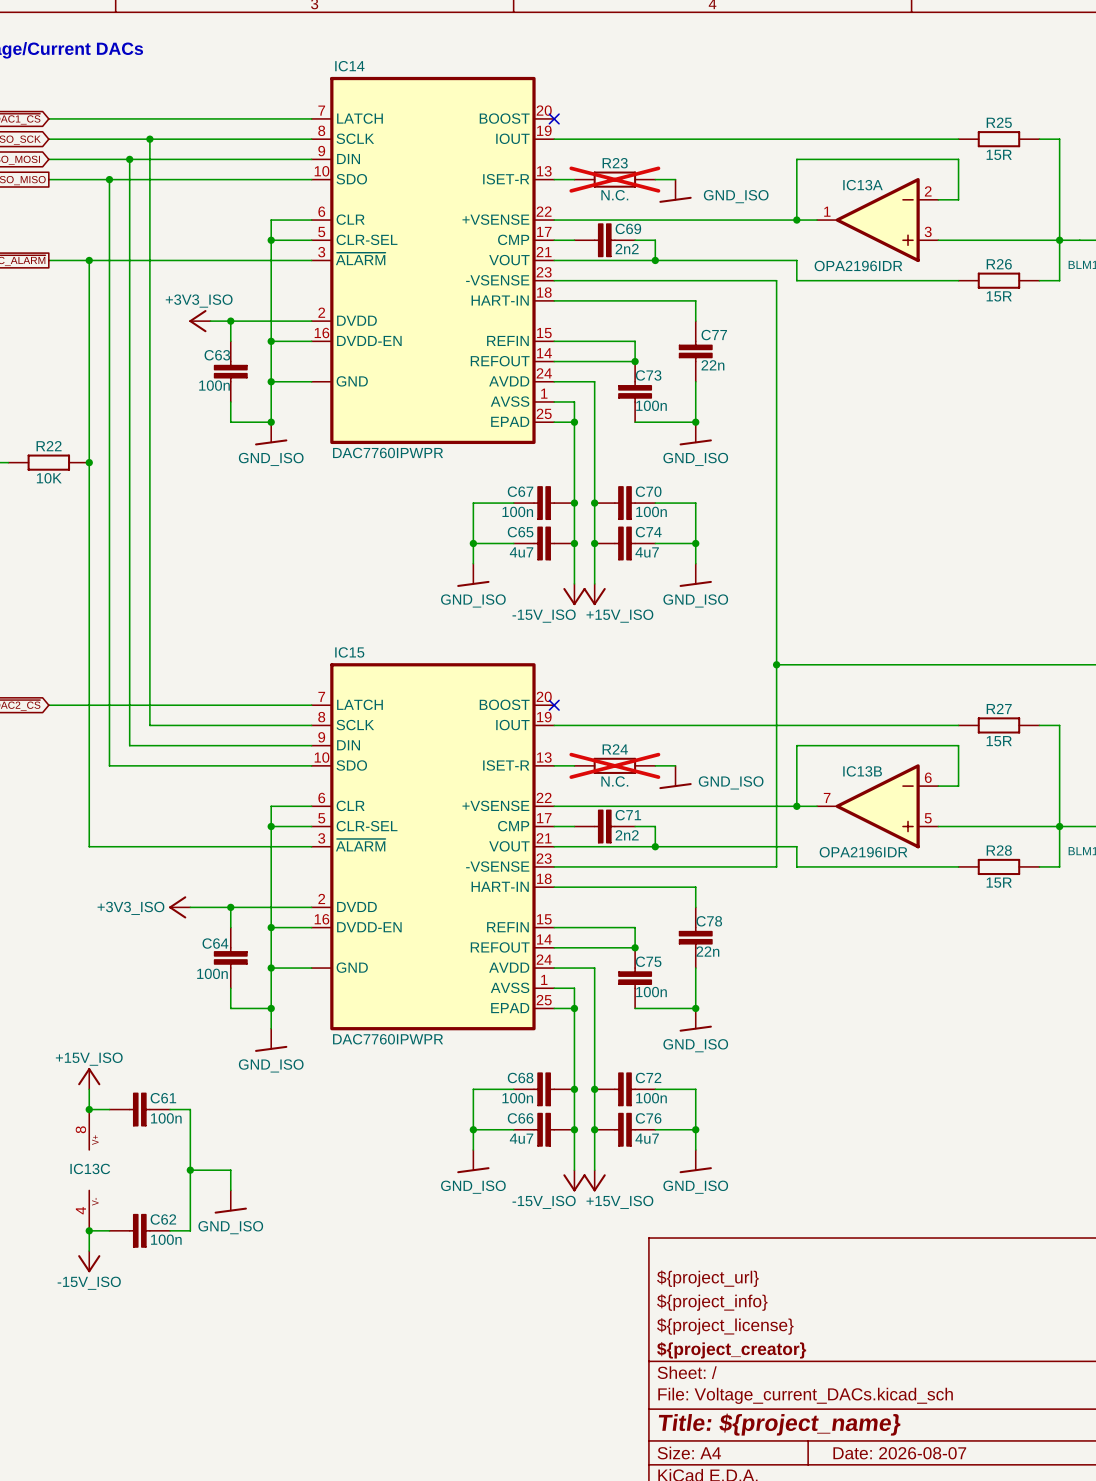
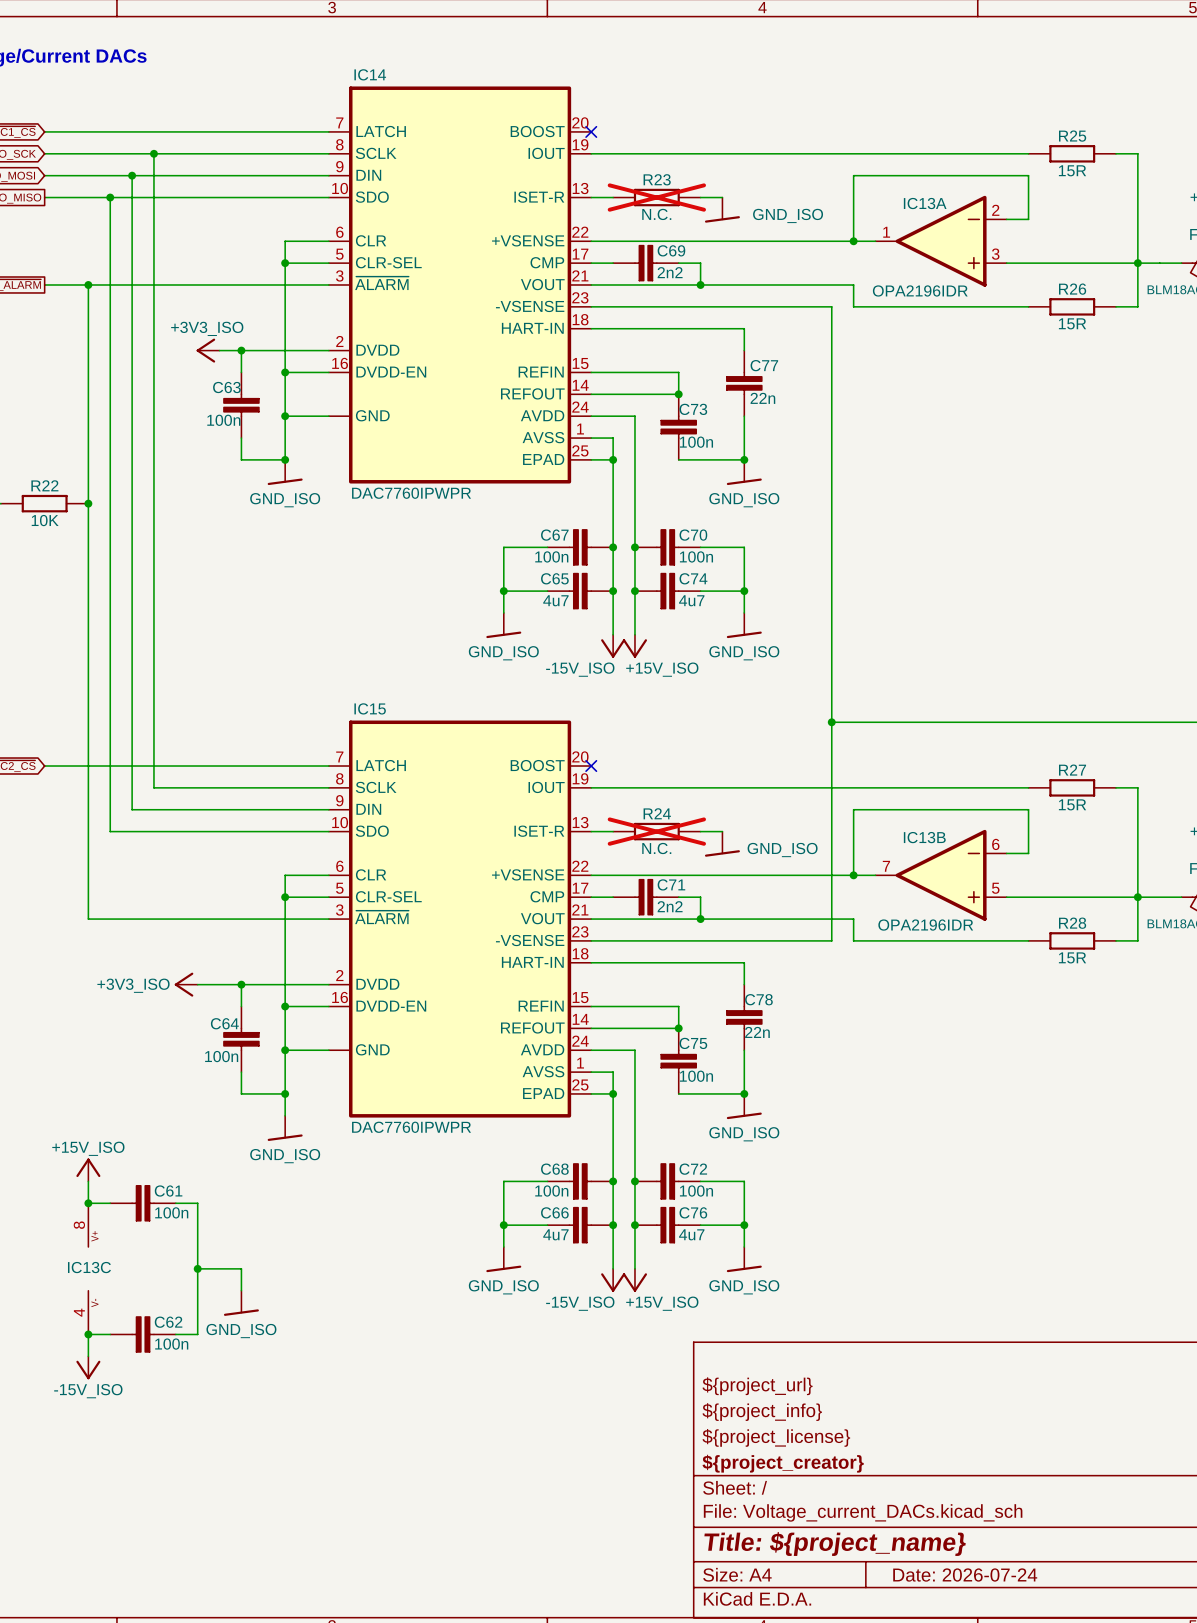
title block: Date: 2026-08-07 (899, 1453) -> Date: 2026-07-24 (965, 1575)

